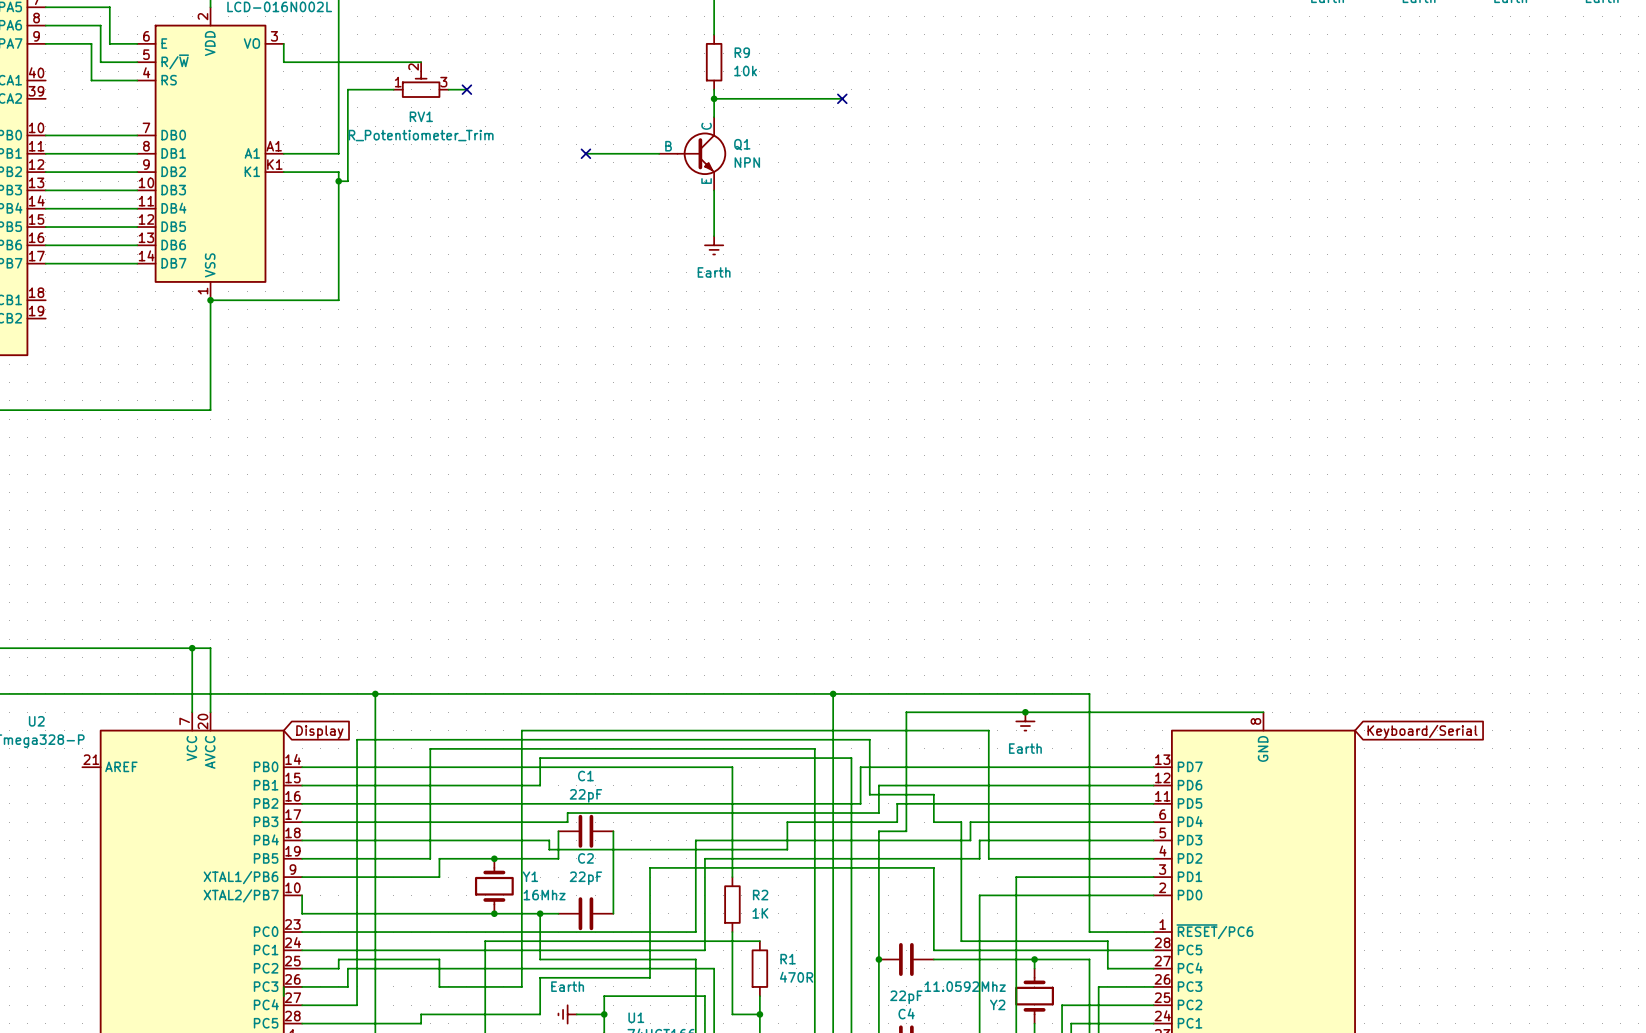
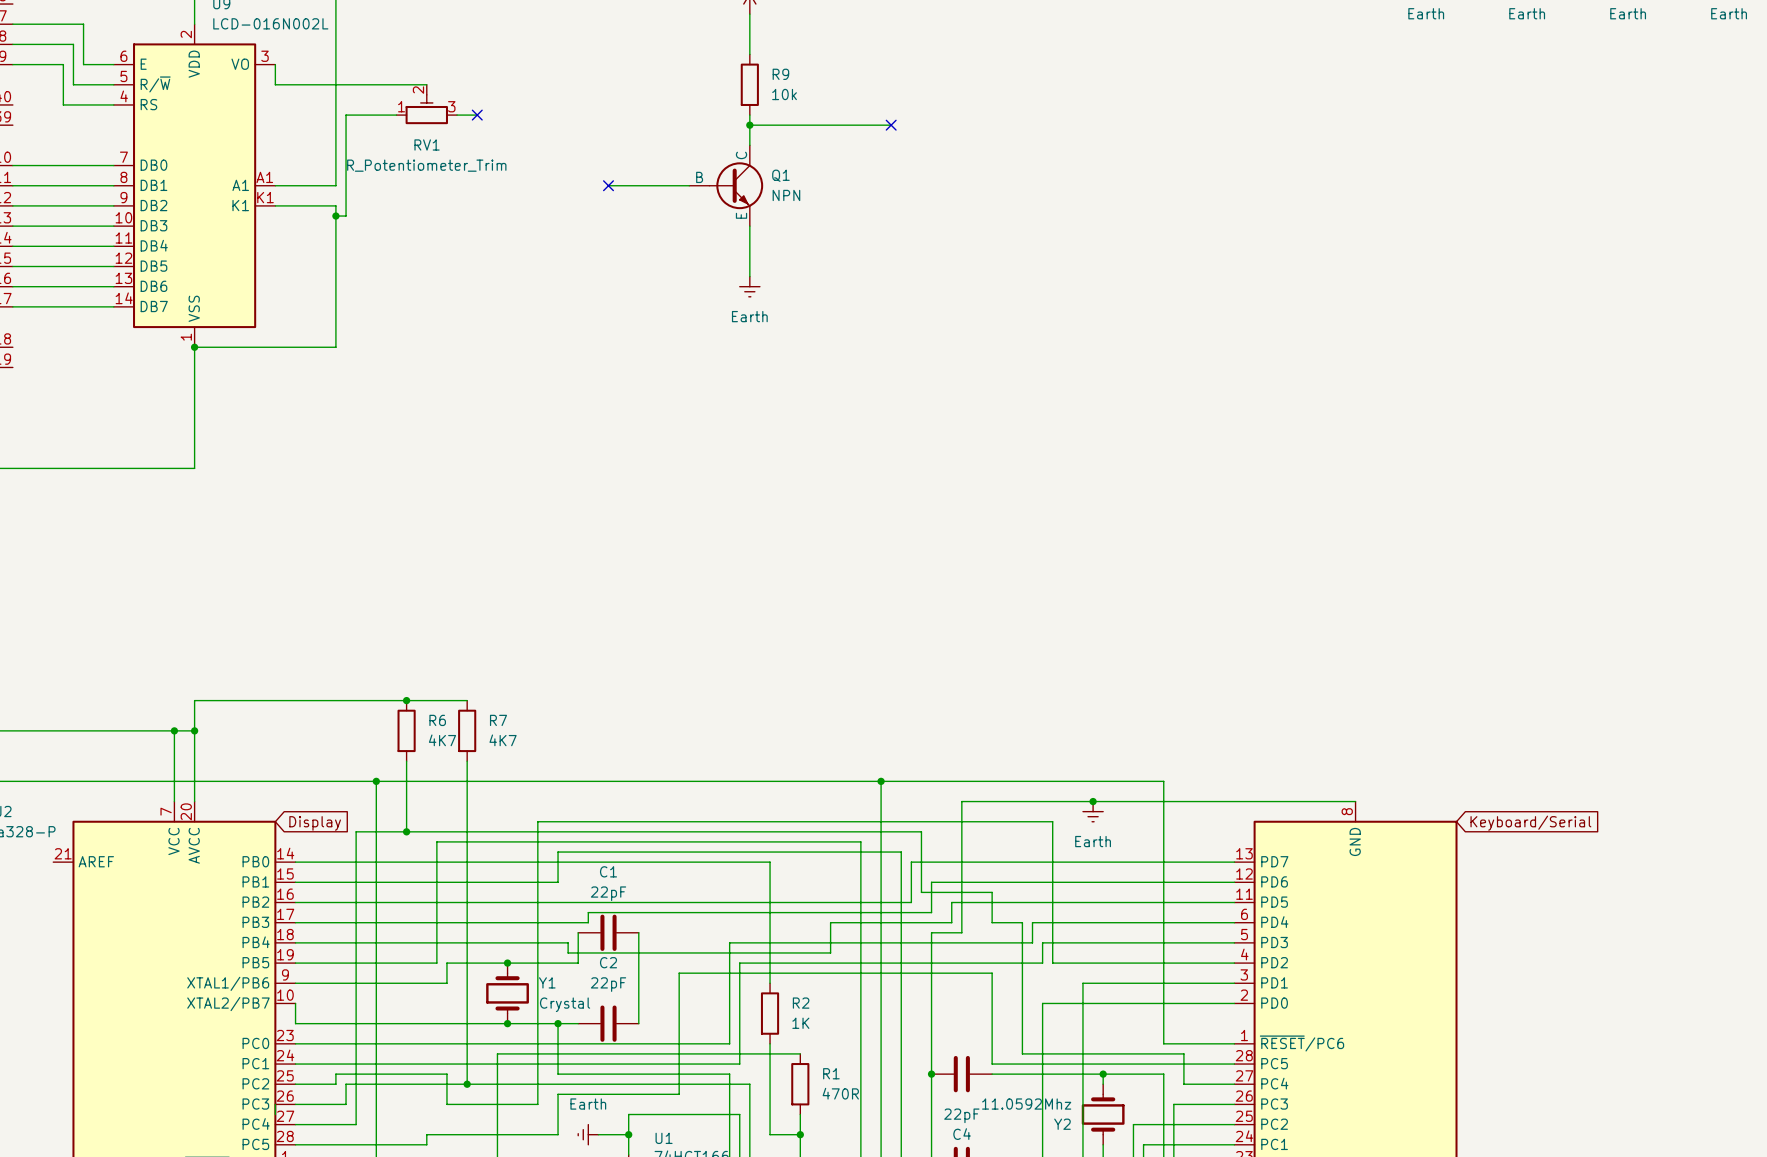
junction: none -> (406, 700)
wire: none -> (467, 700) (194, 700) (194, 730)
junction: none -> (194, 730)
R6: none -> 4K7 (406, 730)
R7: none -> 4K7 (467, 730)
wire: none -> (406, 761) (406, 831)
wire: none -> (467, 761) (467, 1084)
junction: none -> (406, 831)
Y1 value: 16Mhz (544, 895) -> Crystal (565, 1004)
junction: none -> (467, 1084)

